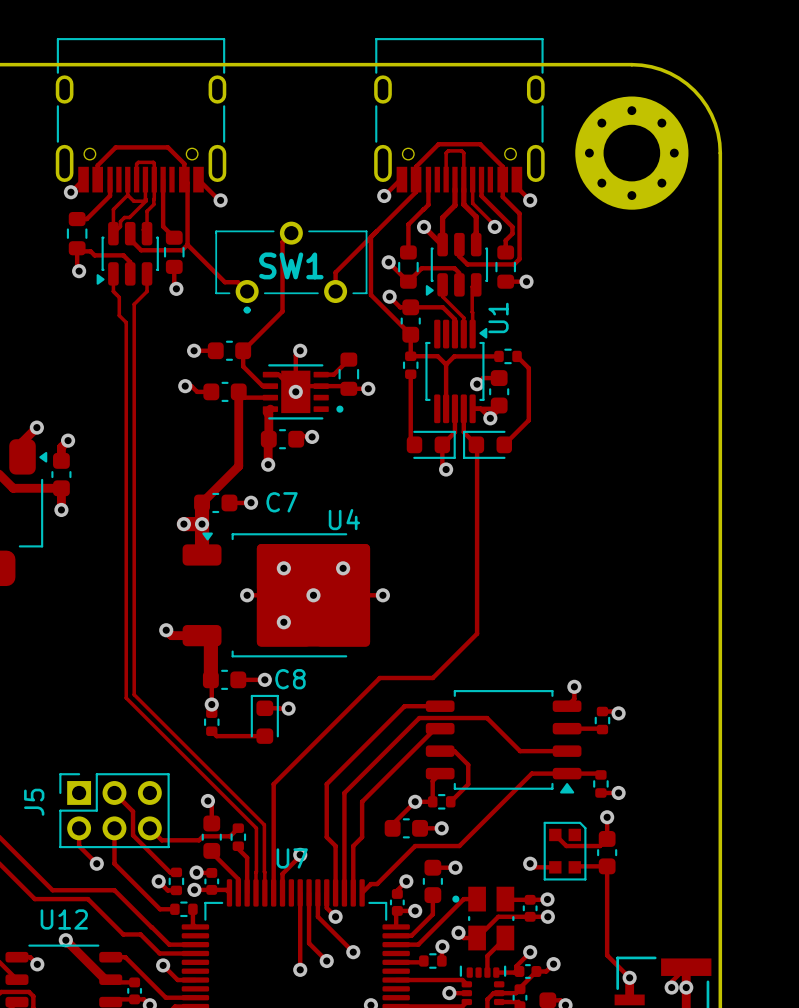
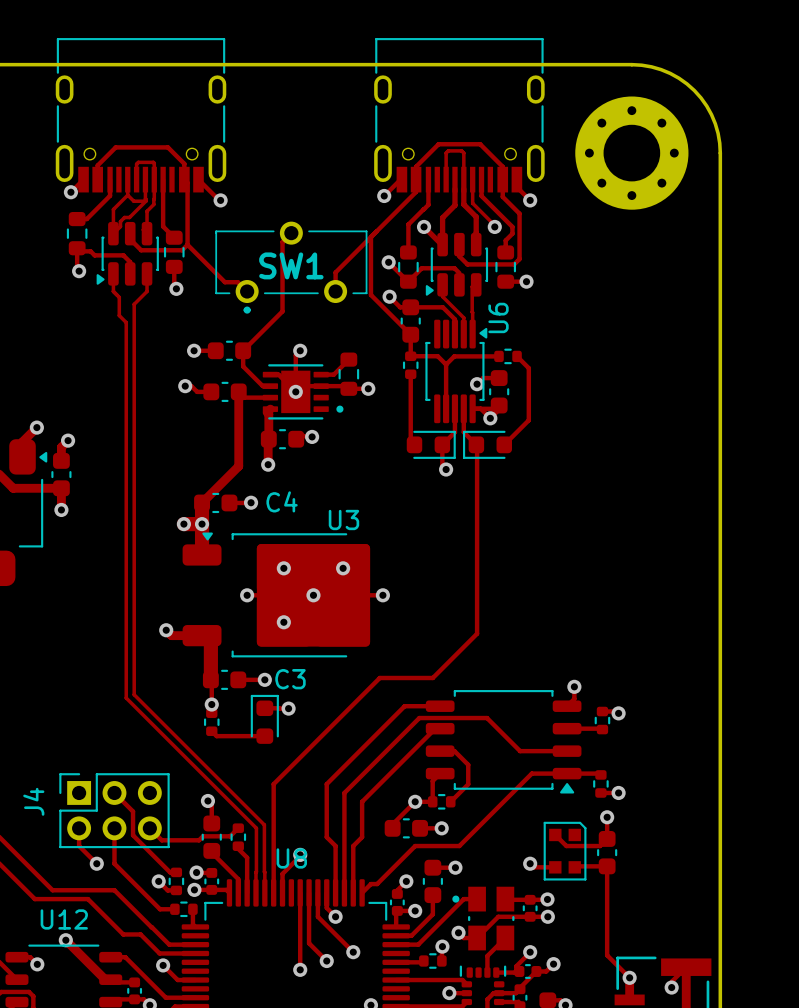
U1 name: U1 (498, 317) -> U6 (498, 317)
C7 name: C7 (282, 502) -> C4 (282, 501)
U4 name: U4 (344, 519) -> U3 (343, 520)
C8 name: C8 (290, 679) -> C3 (290, 679)
J5 name: J5 (34, 802) -> J4 (33, 801)
U7 name: U7 (292, 858) -> U8 (291, 858)
via: (686, 987) -> none

